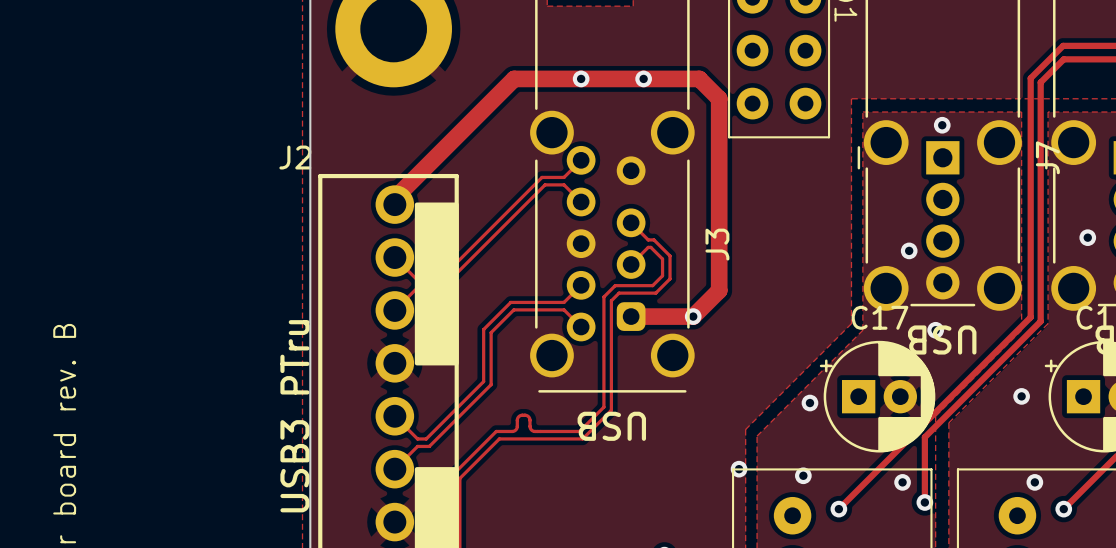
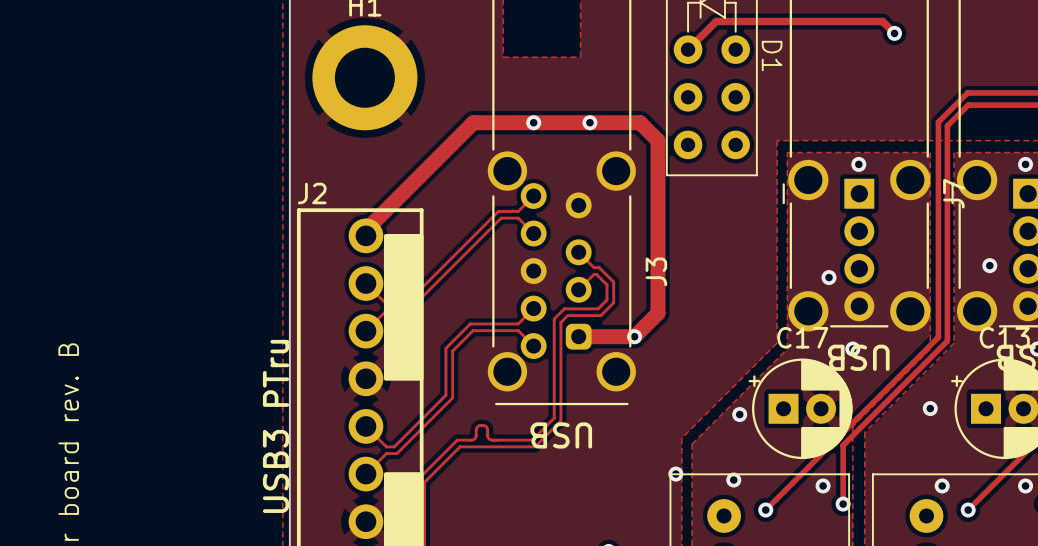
J2 name position: J2 (295, 157) -> J2 (312, 193)

